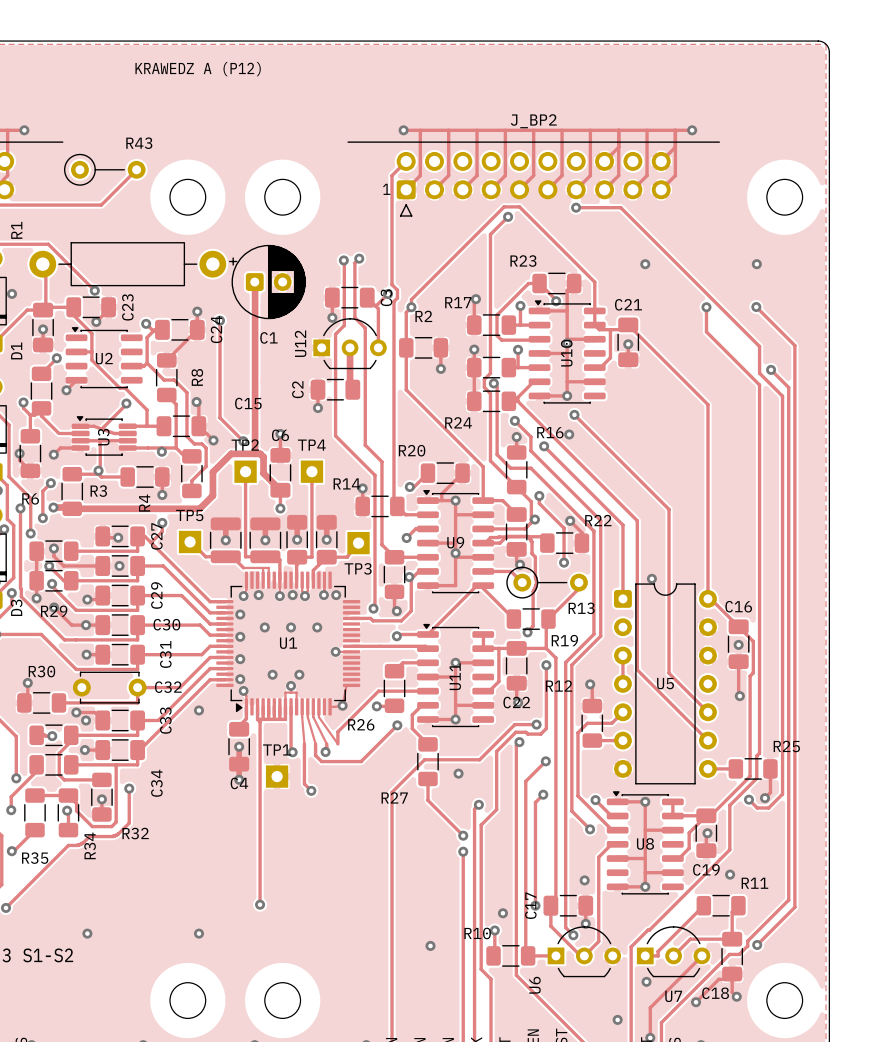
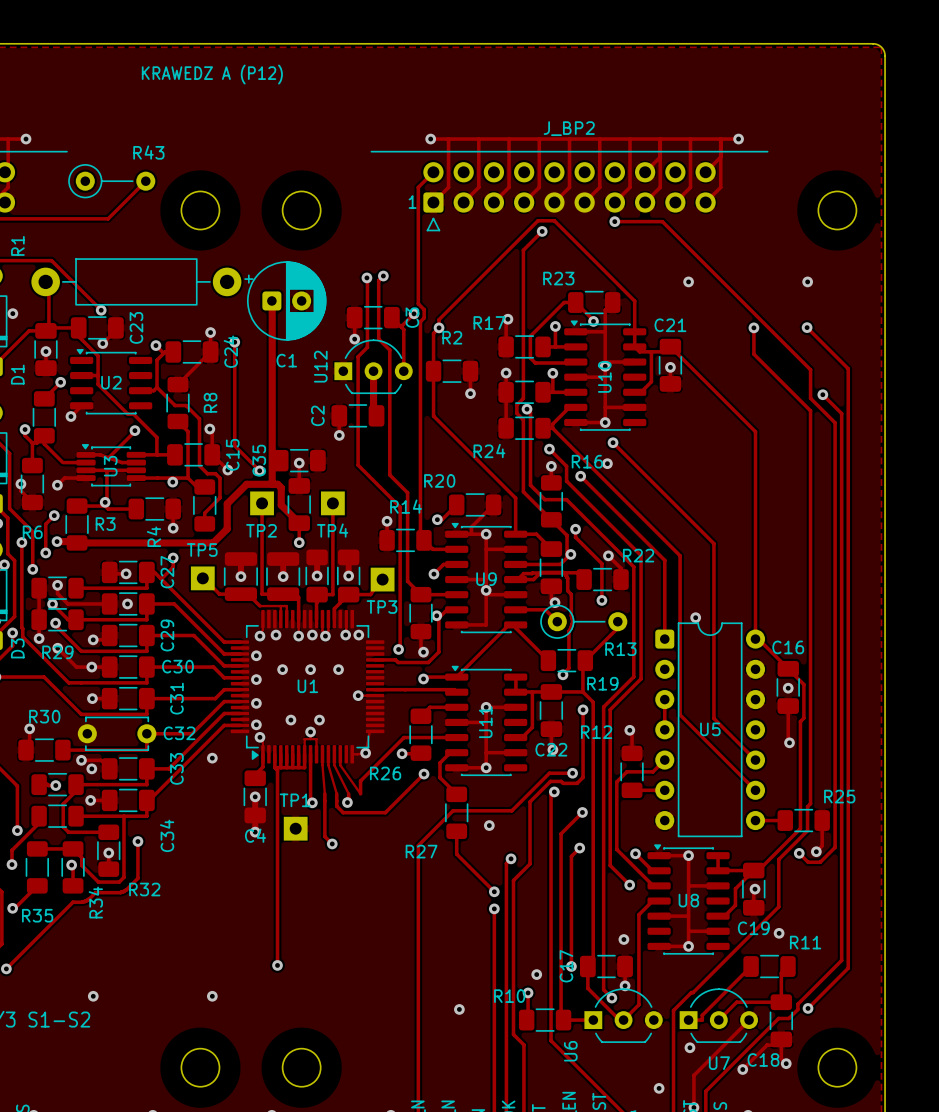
C15 name rotation: 0° (248, 403) -> 90° counterclockwise (232, 454)
C35: none -> (299, 460)
C6 name: C6 (280, 435) -> none
TP2 name position: TP2 (245, 445) -> TP2 (261, 530)
TP4 name position: TP4 (311, 445) -> TP4 (332, 530)
R14 name position: R14 (346, 483) -> R14 (406, 506)

